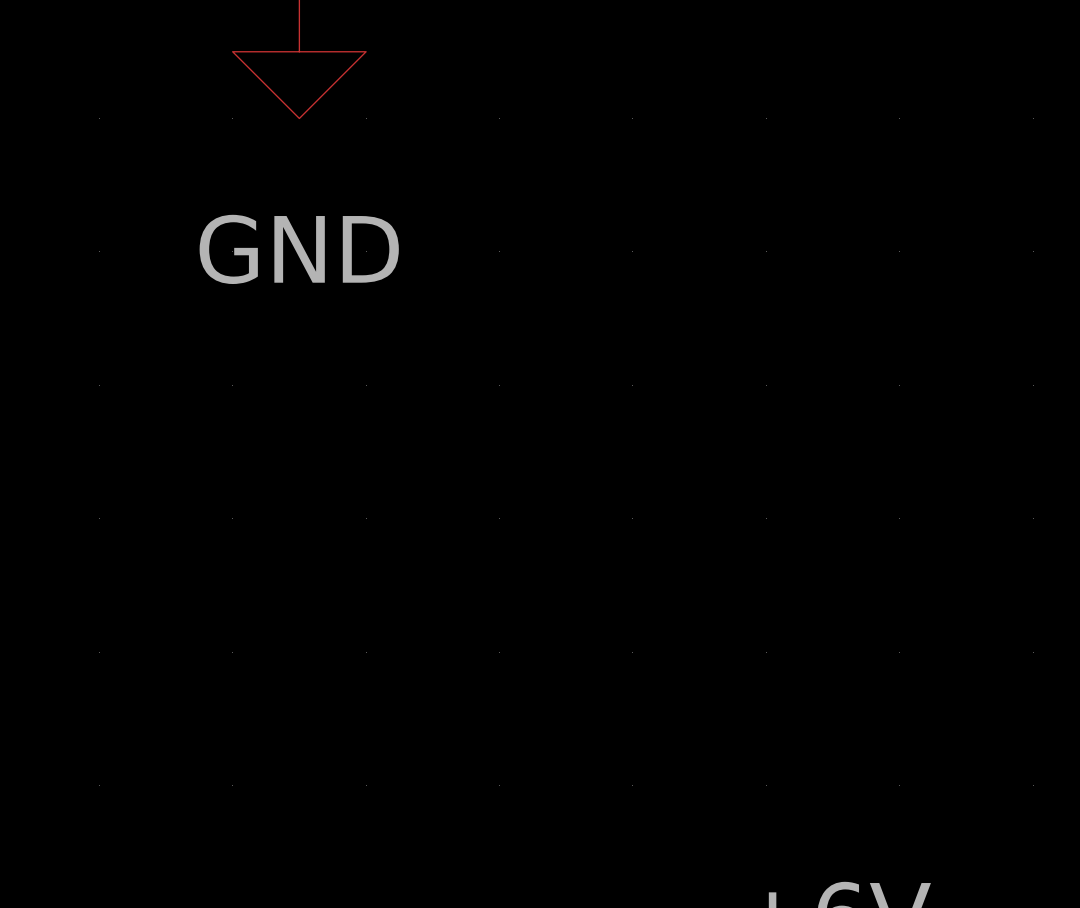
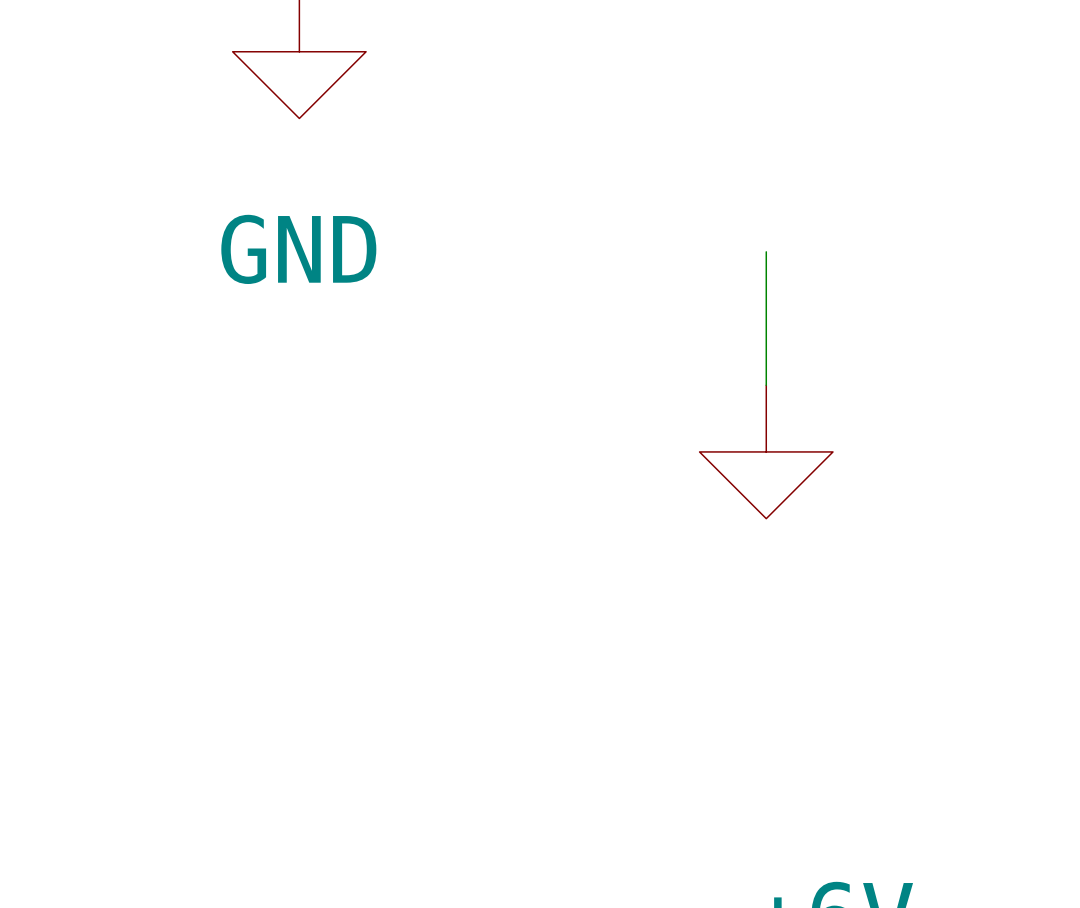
wire: none -> (766, 251) (766, 385)
power symbol: none -> (766, 451)

